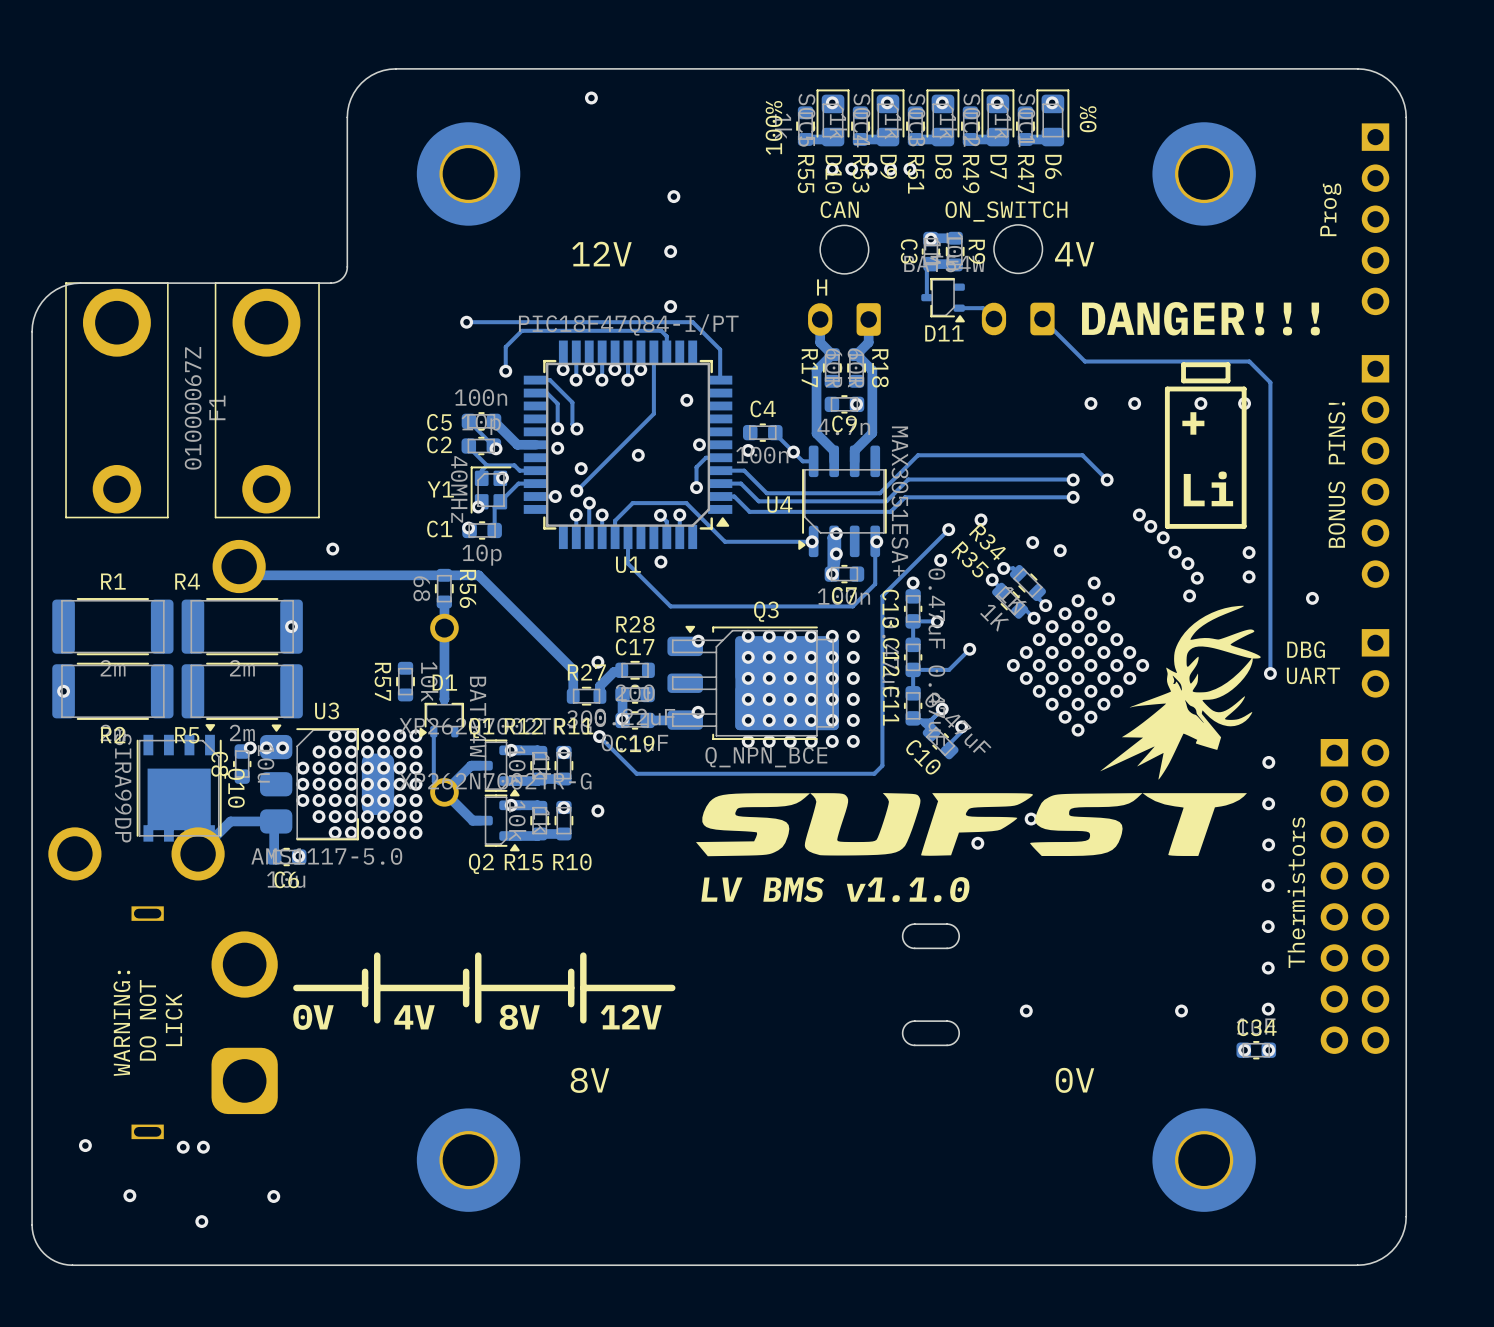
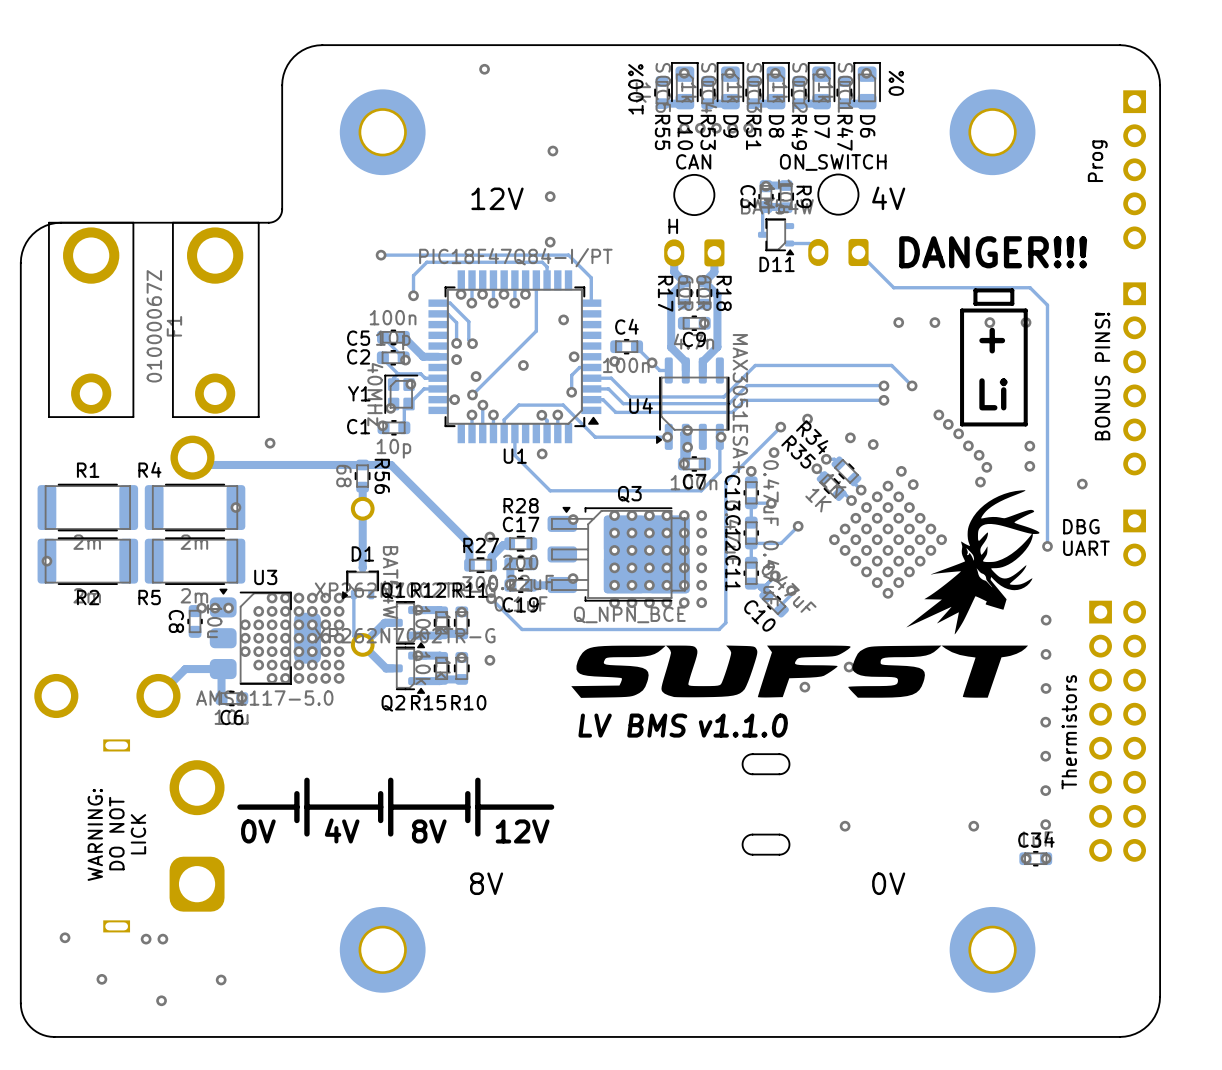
R57: 10k (405, 681) -> none
Q10: SIRA99DP (179, 782) -> none

